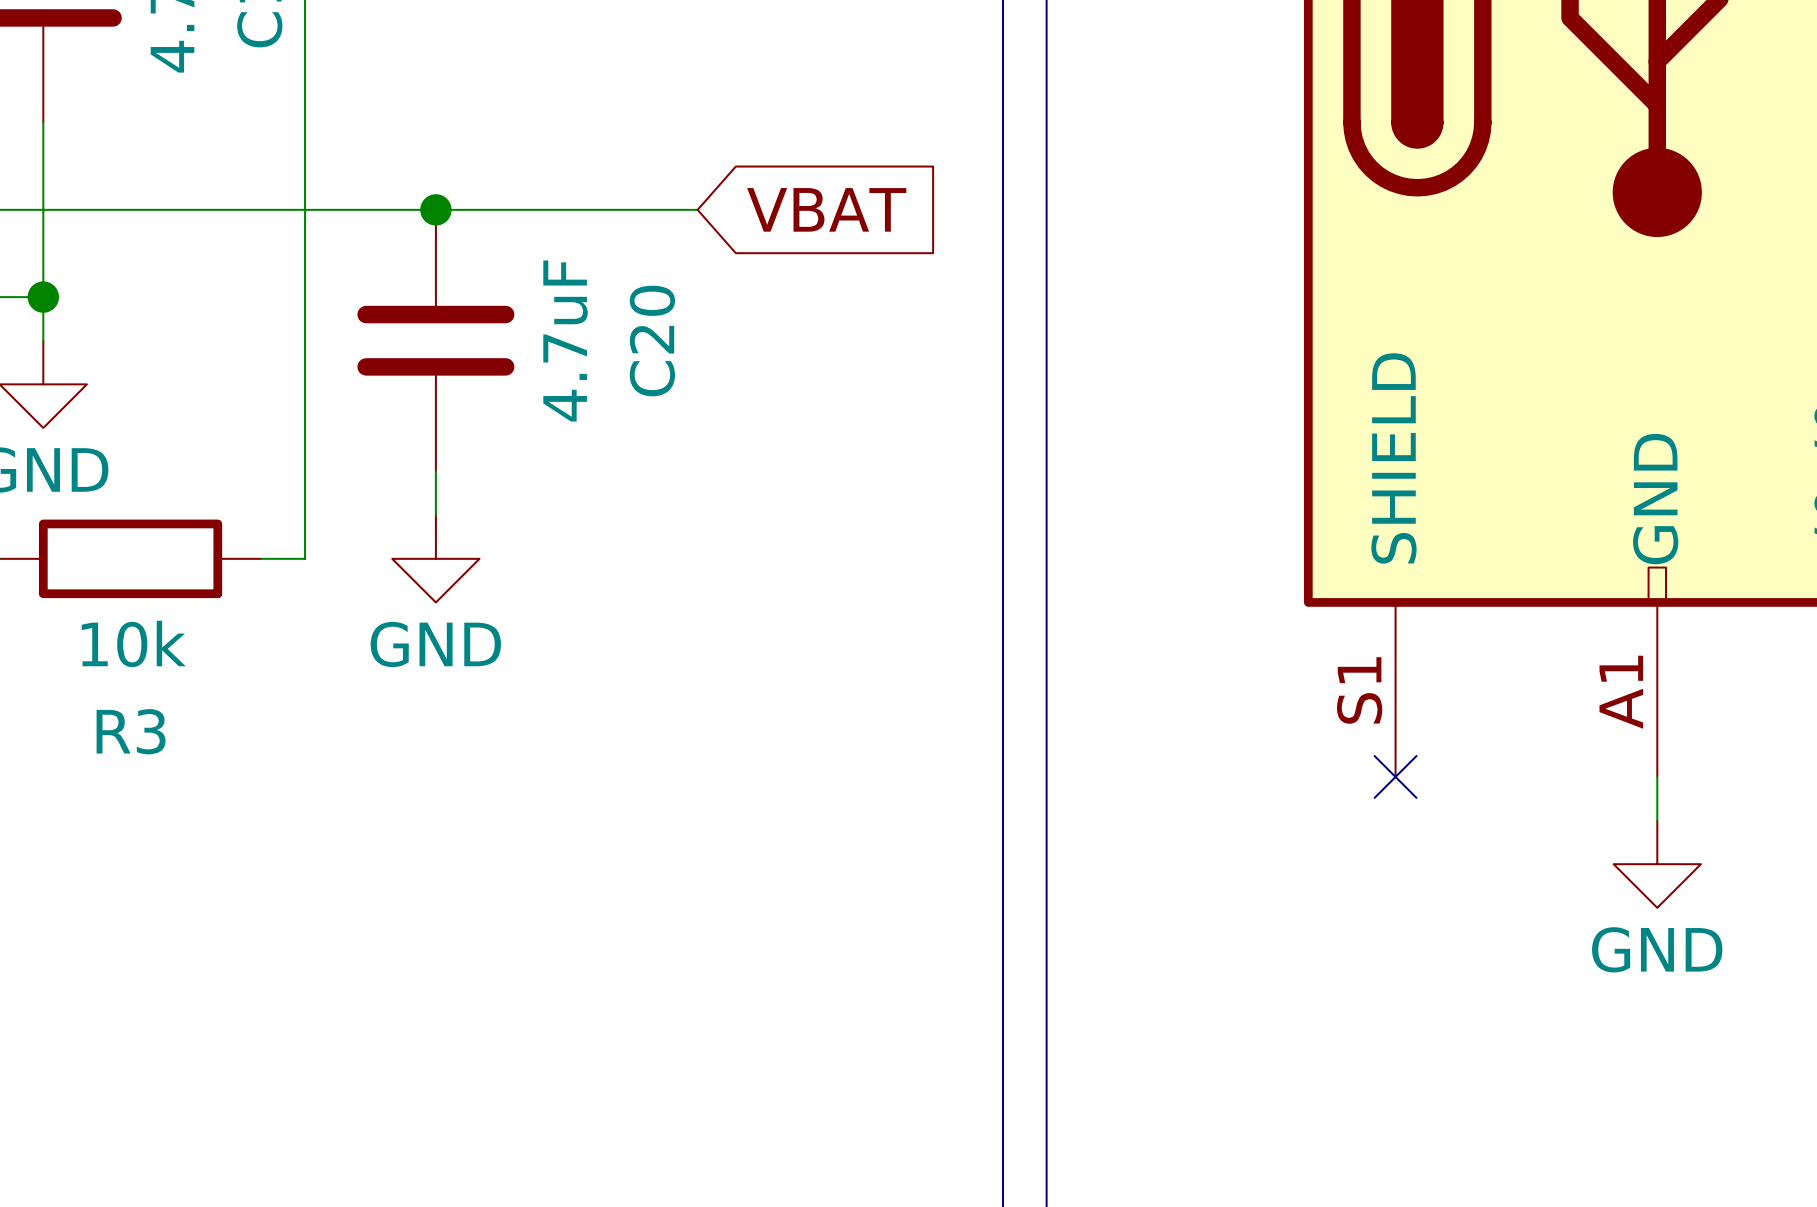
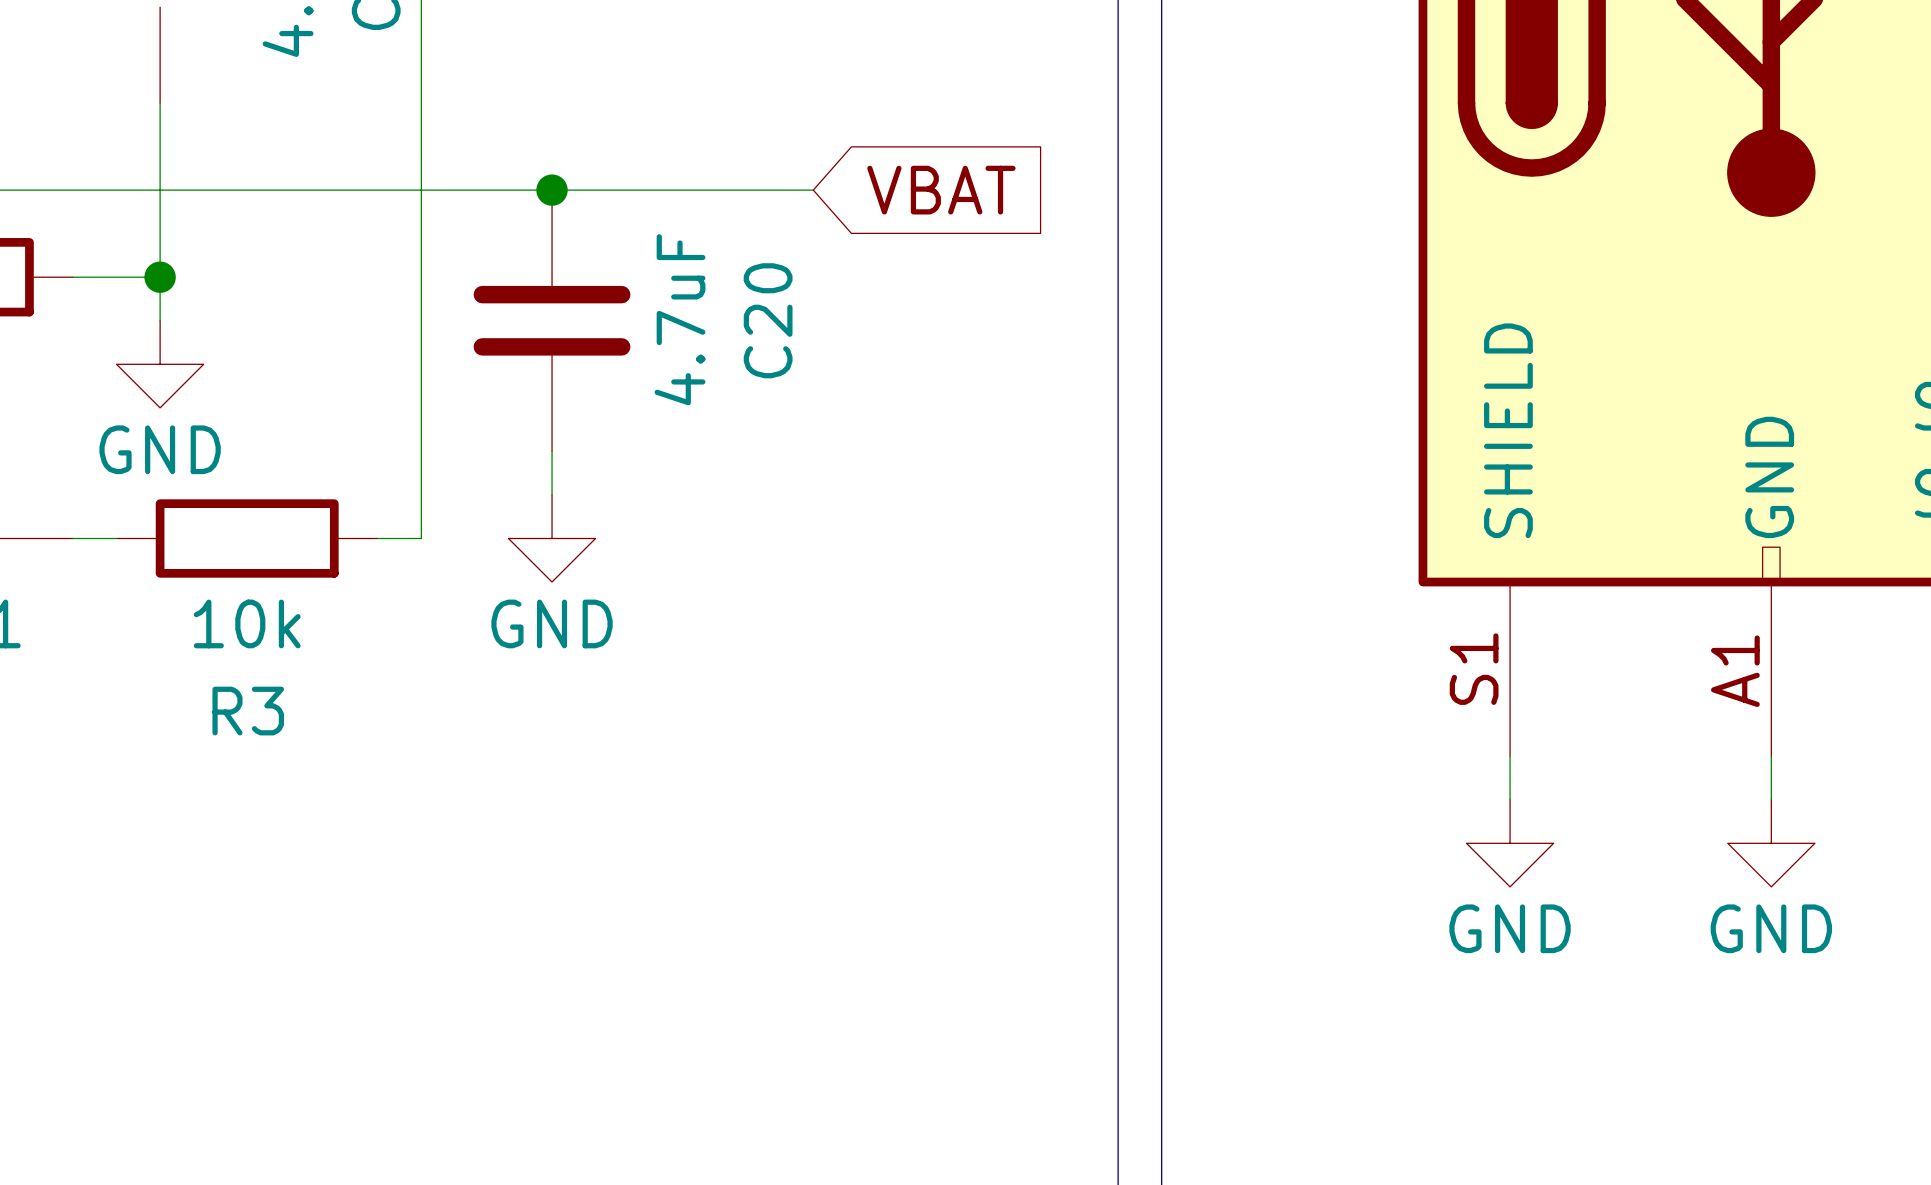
wire: none -> (1510, 756) (1510, 799)
no-connect mark: (1395, 776) -> none
power symbol: none -> GND (1510, 843)

